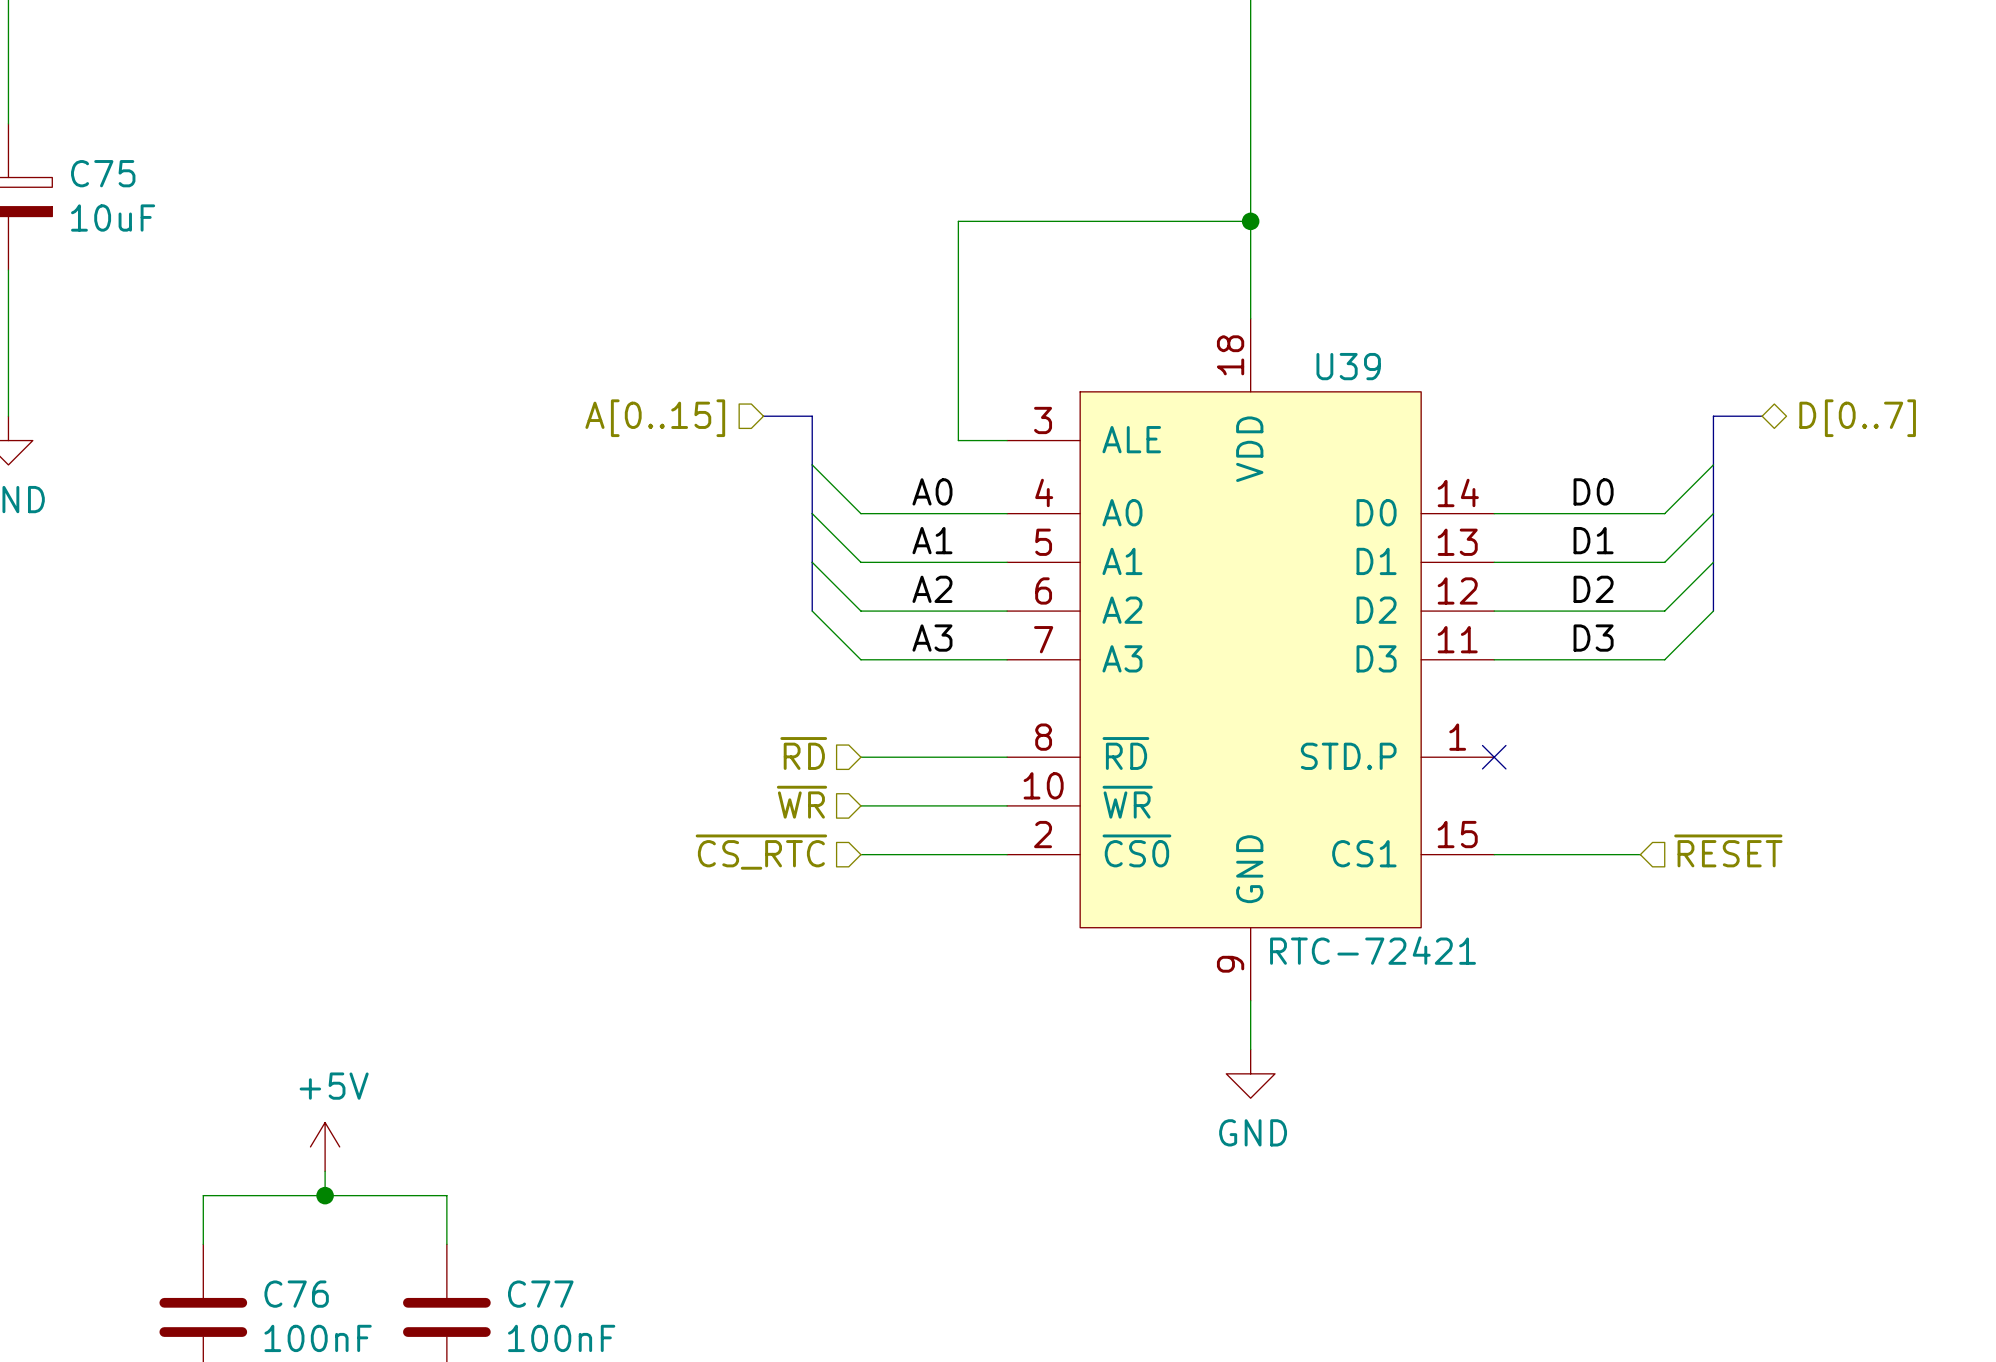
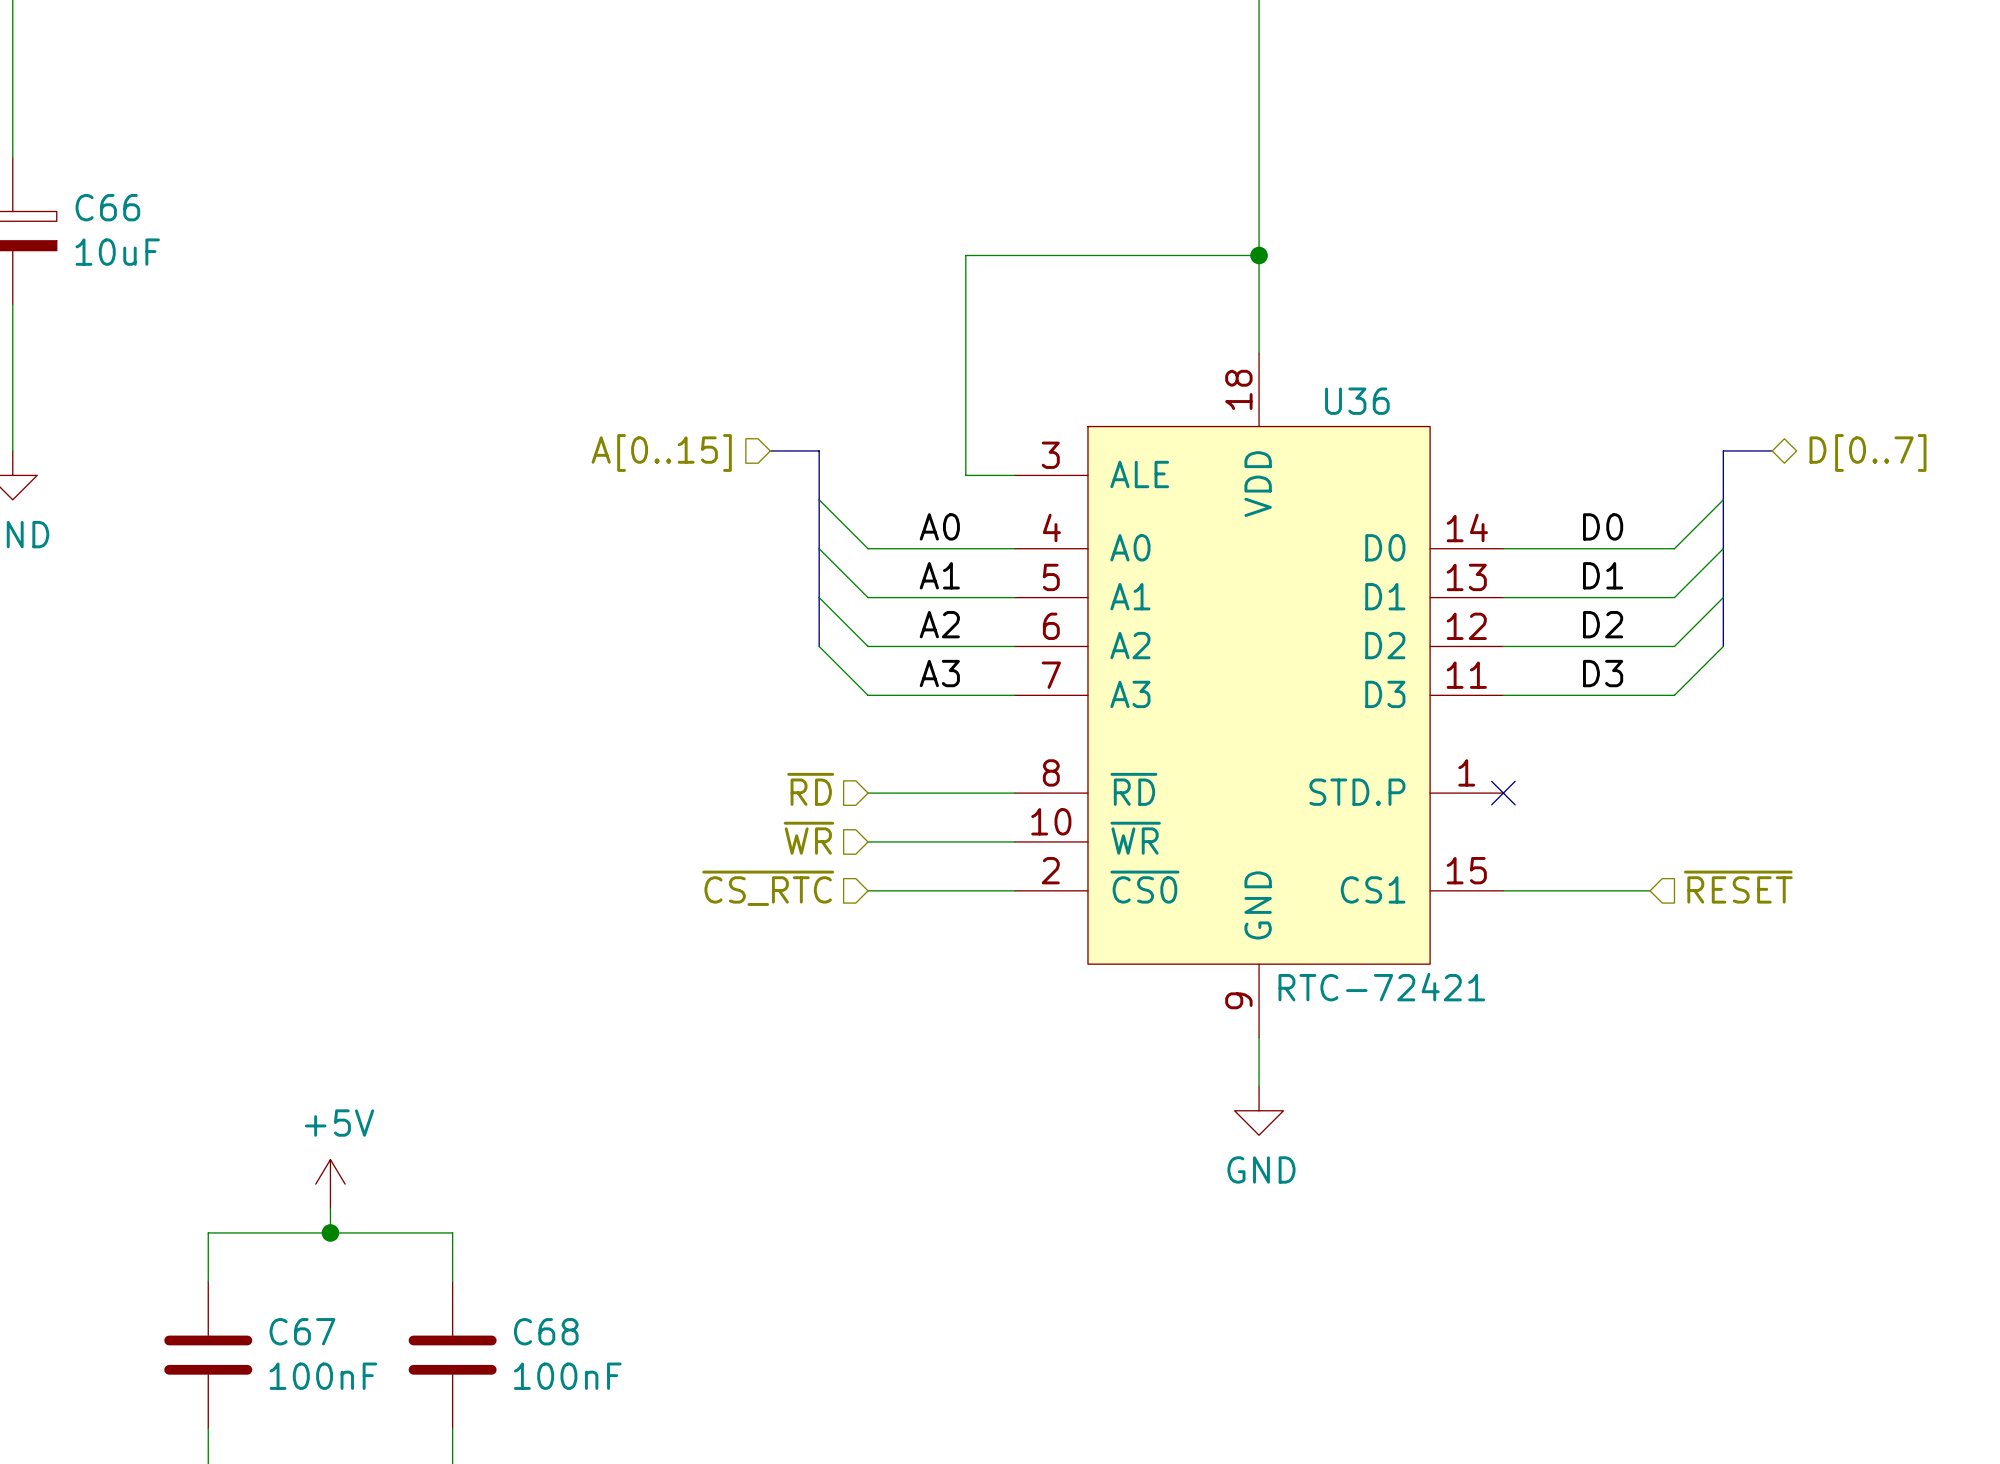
C75 name: C75 (103, 173) -> C66 (107, 207)
U39 name: U39 (1348, 366) -> U36 (1357, 401)
C76 name: C76 (296, 1294) -> C67 (302, 1331)
C77 name: C77 (540, 1294) -> C68 (546, 1331)

